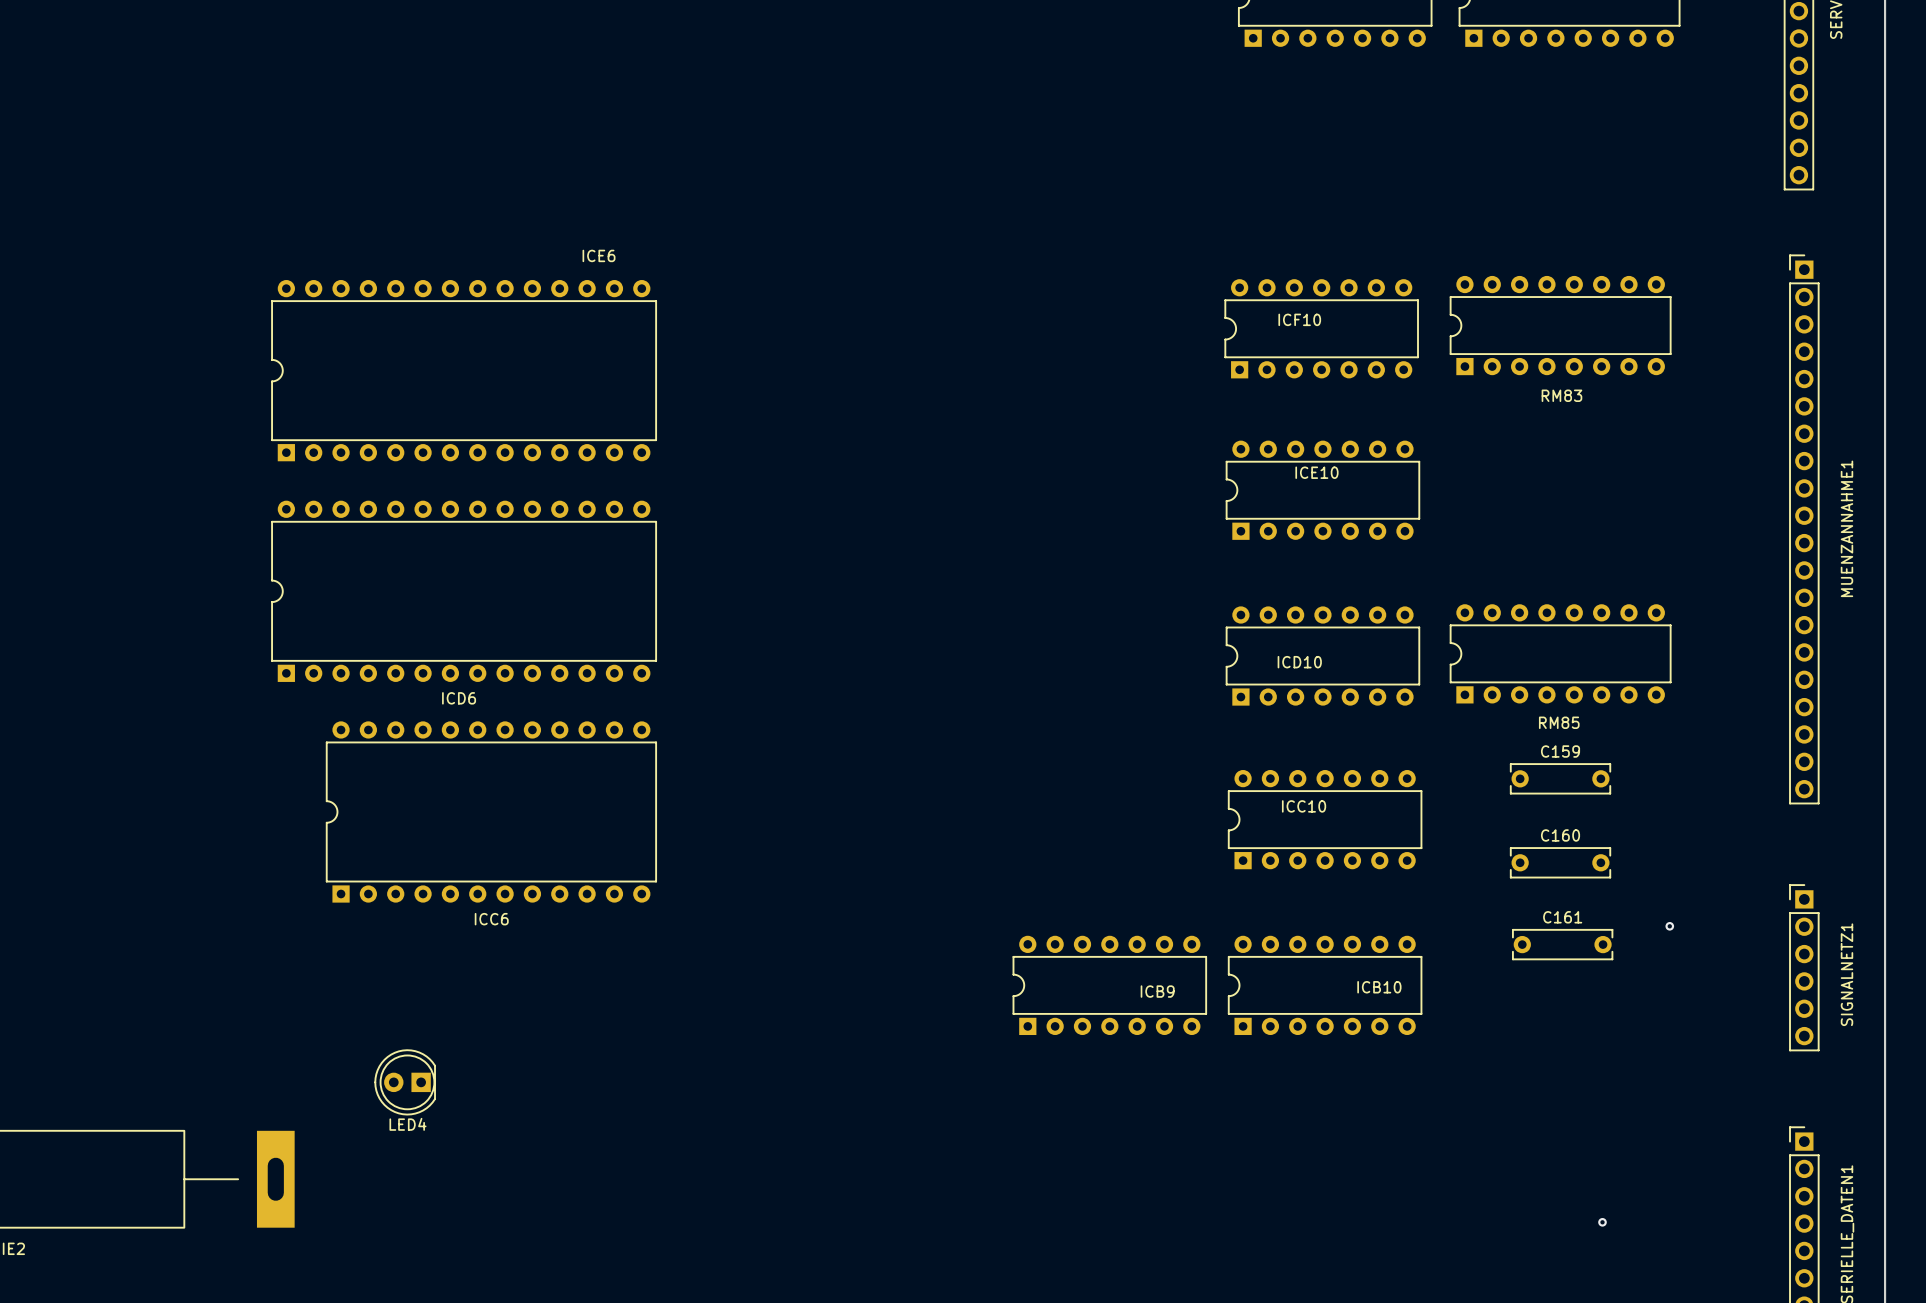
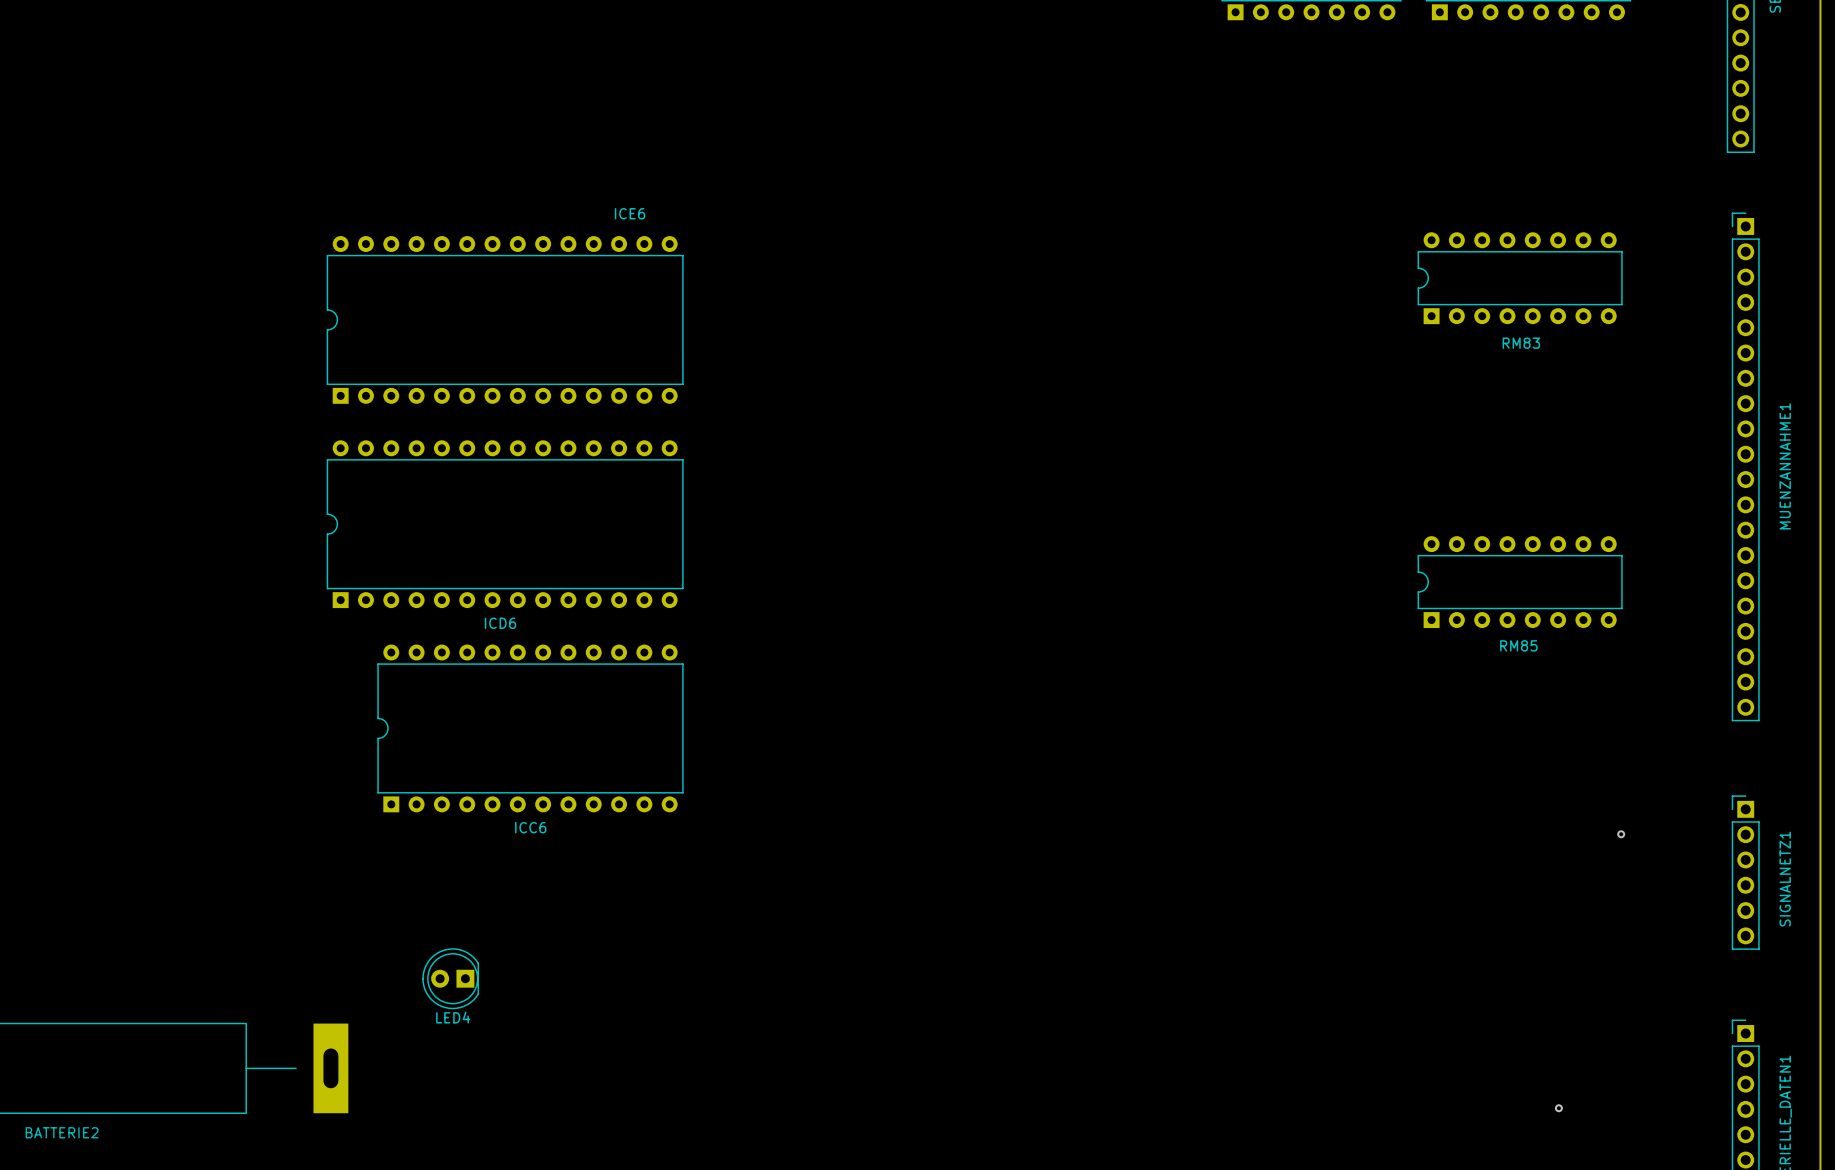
ICF10: (1321, 328) -> none
ICE10: (1322, 490) -> none
ICD10: (1322, 656) -> none
C159: (1560, 778) -> none
ICC10: (1325, 819) -> none
C160: (1560, 862) -> none
C161: (1562, 944) -> none
ICB9: (1109, 985) -> none
ICB10: (1325, 985) -> none

